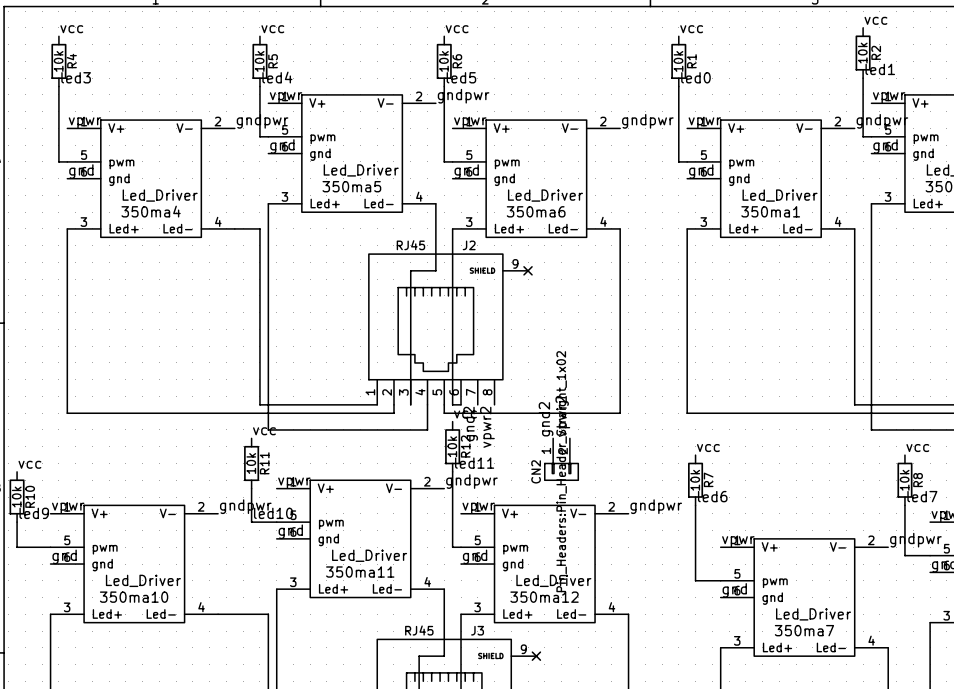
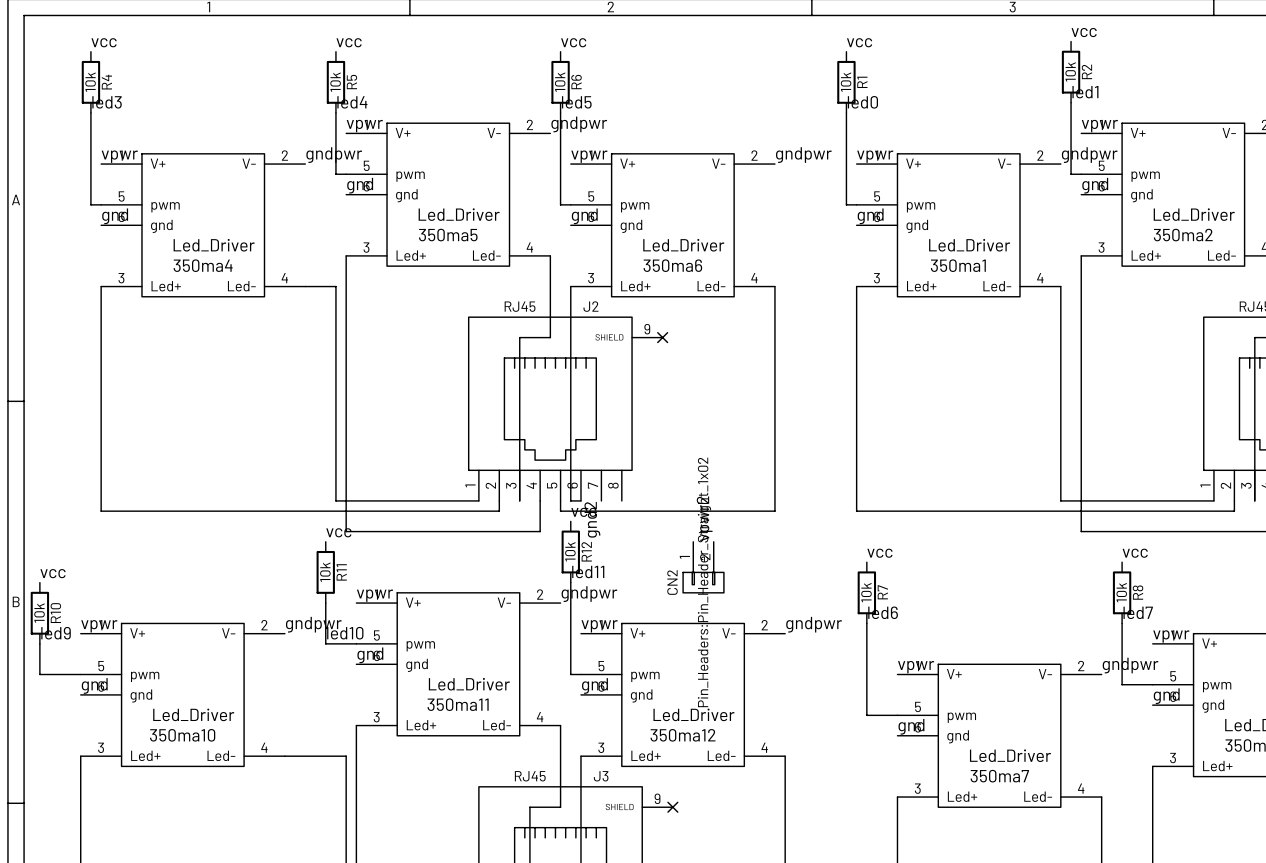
label: gnd2 (546, 419) -> none
label: vpwr2 (487, 427) -> none

